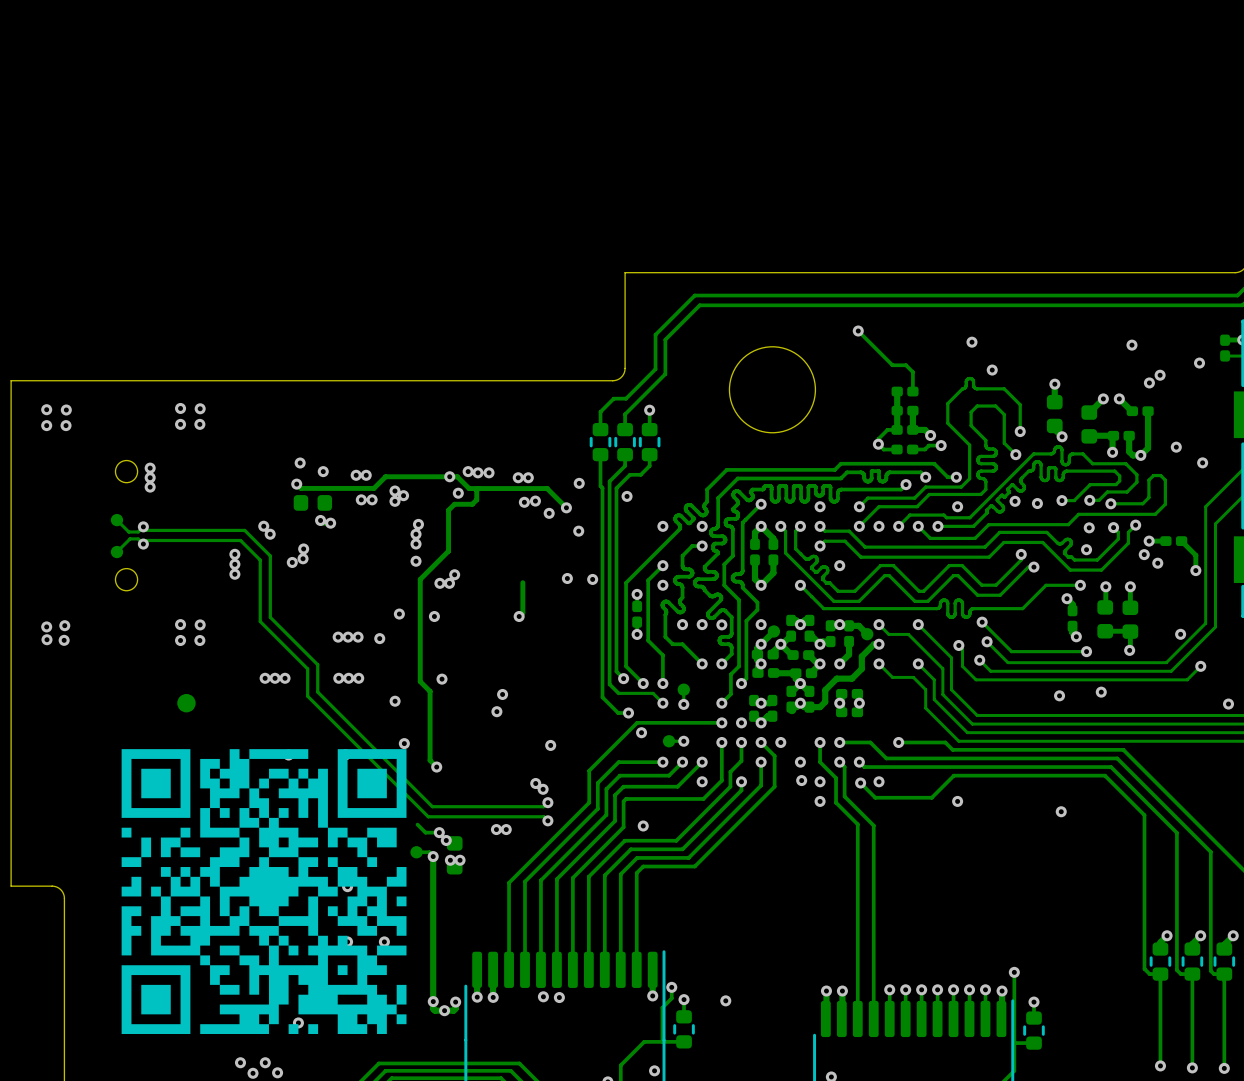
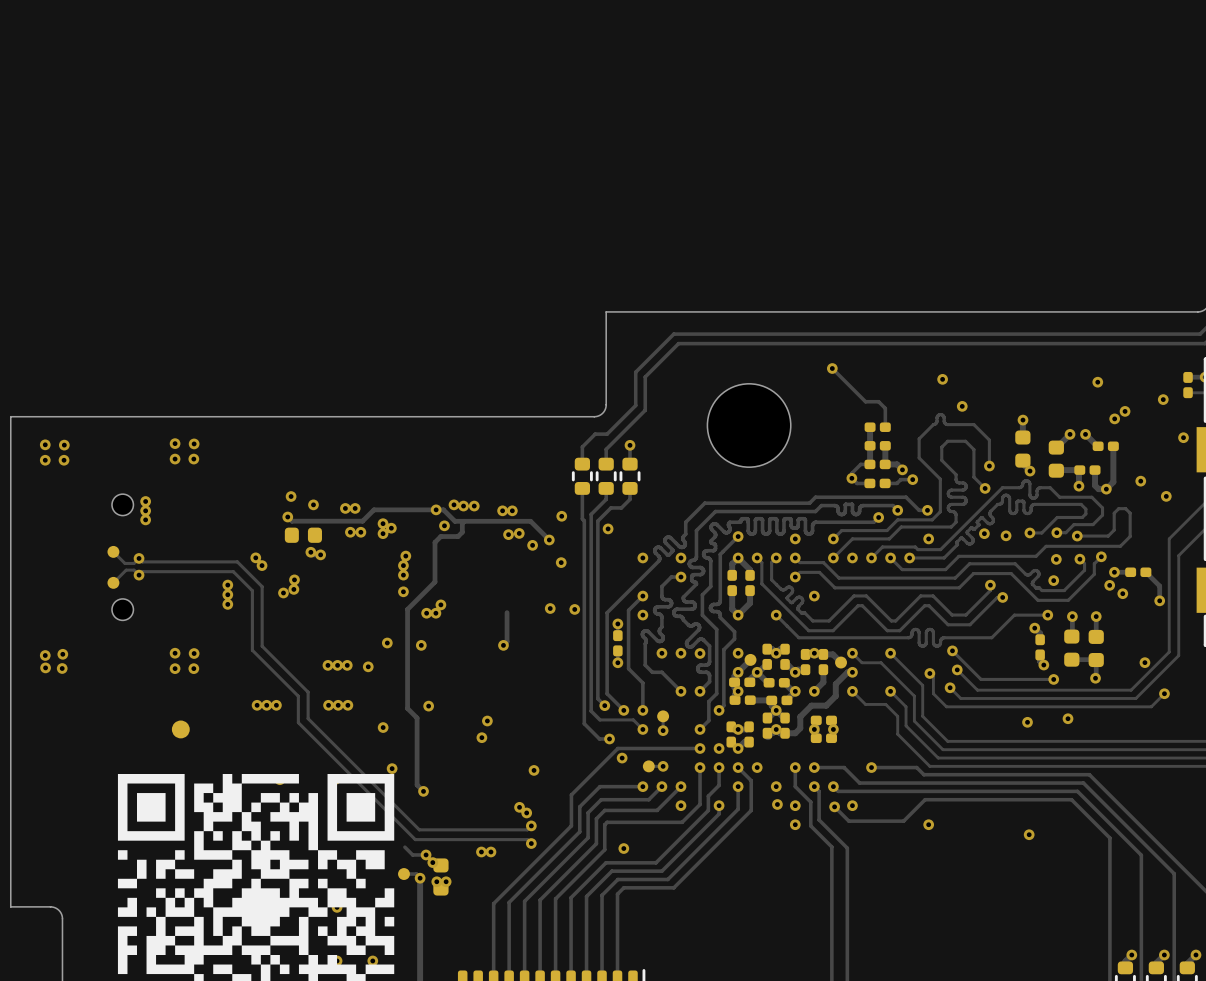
via: none -> (1183, 437)
via: (1228, 704) -> none

